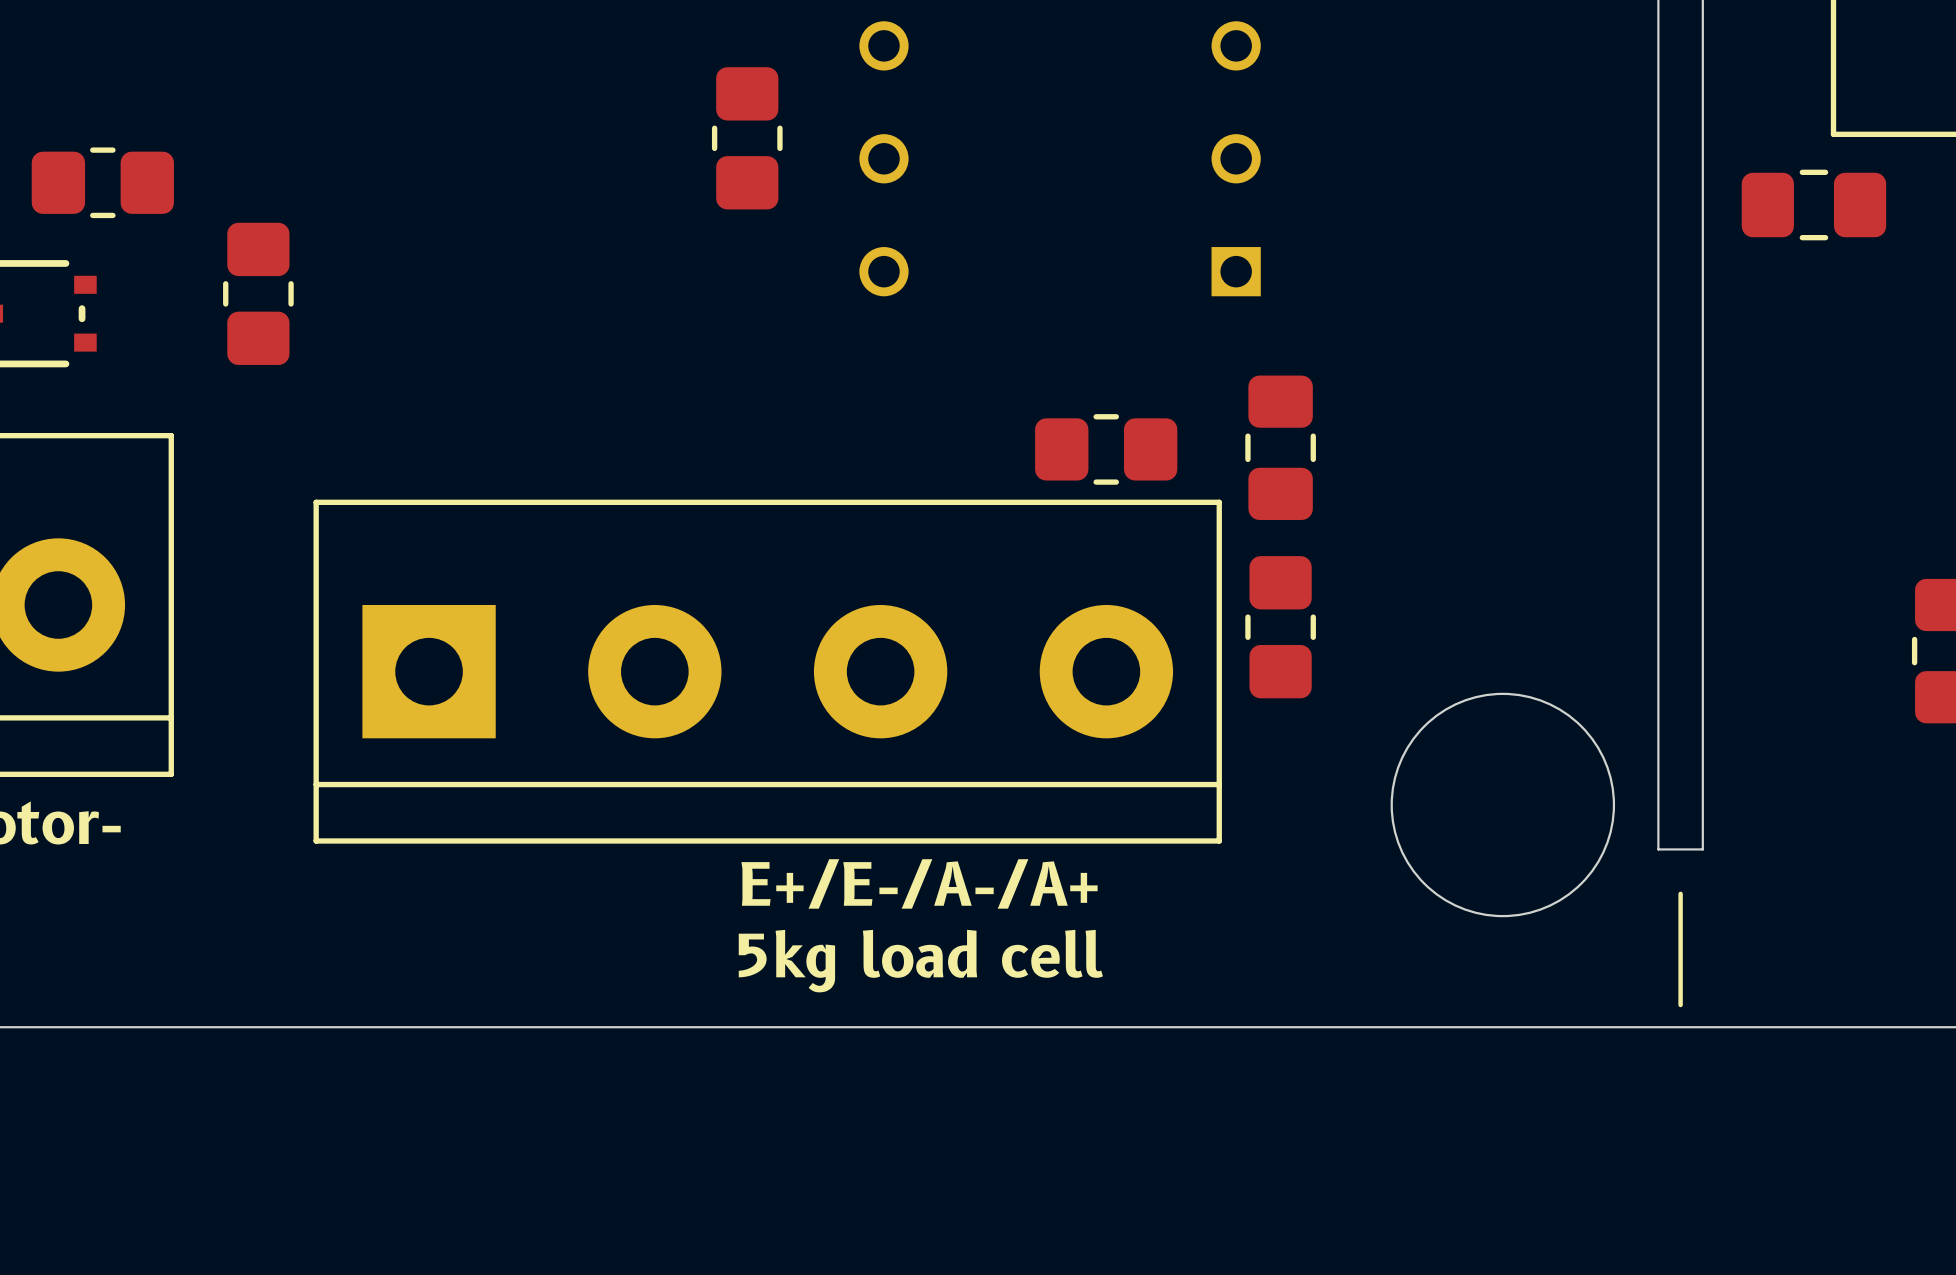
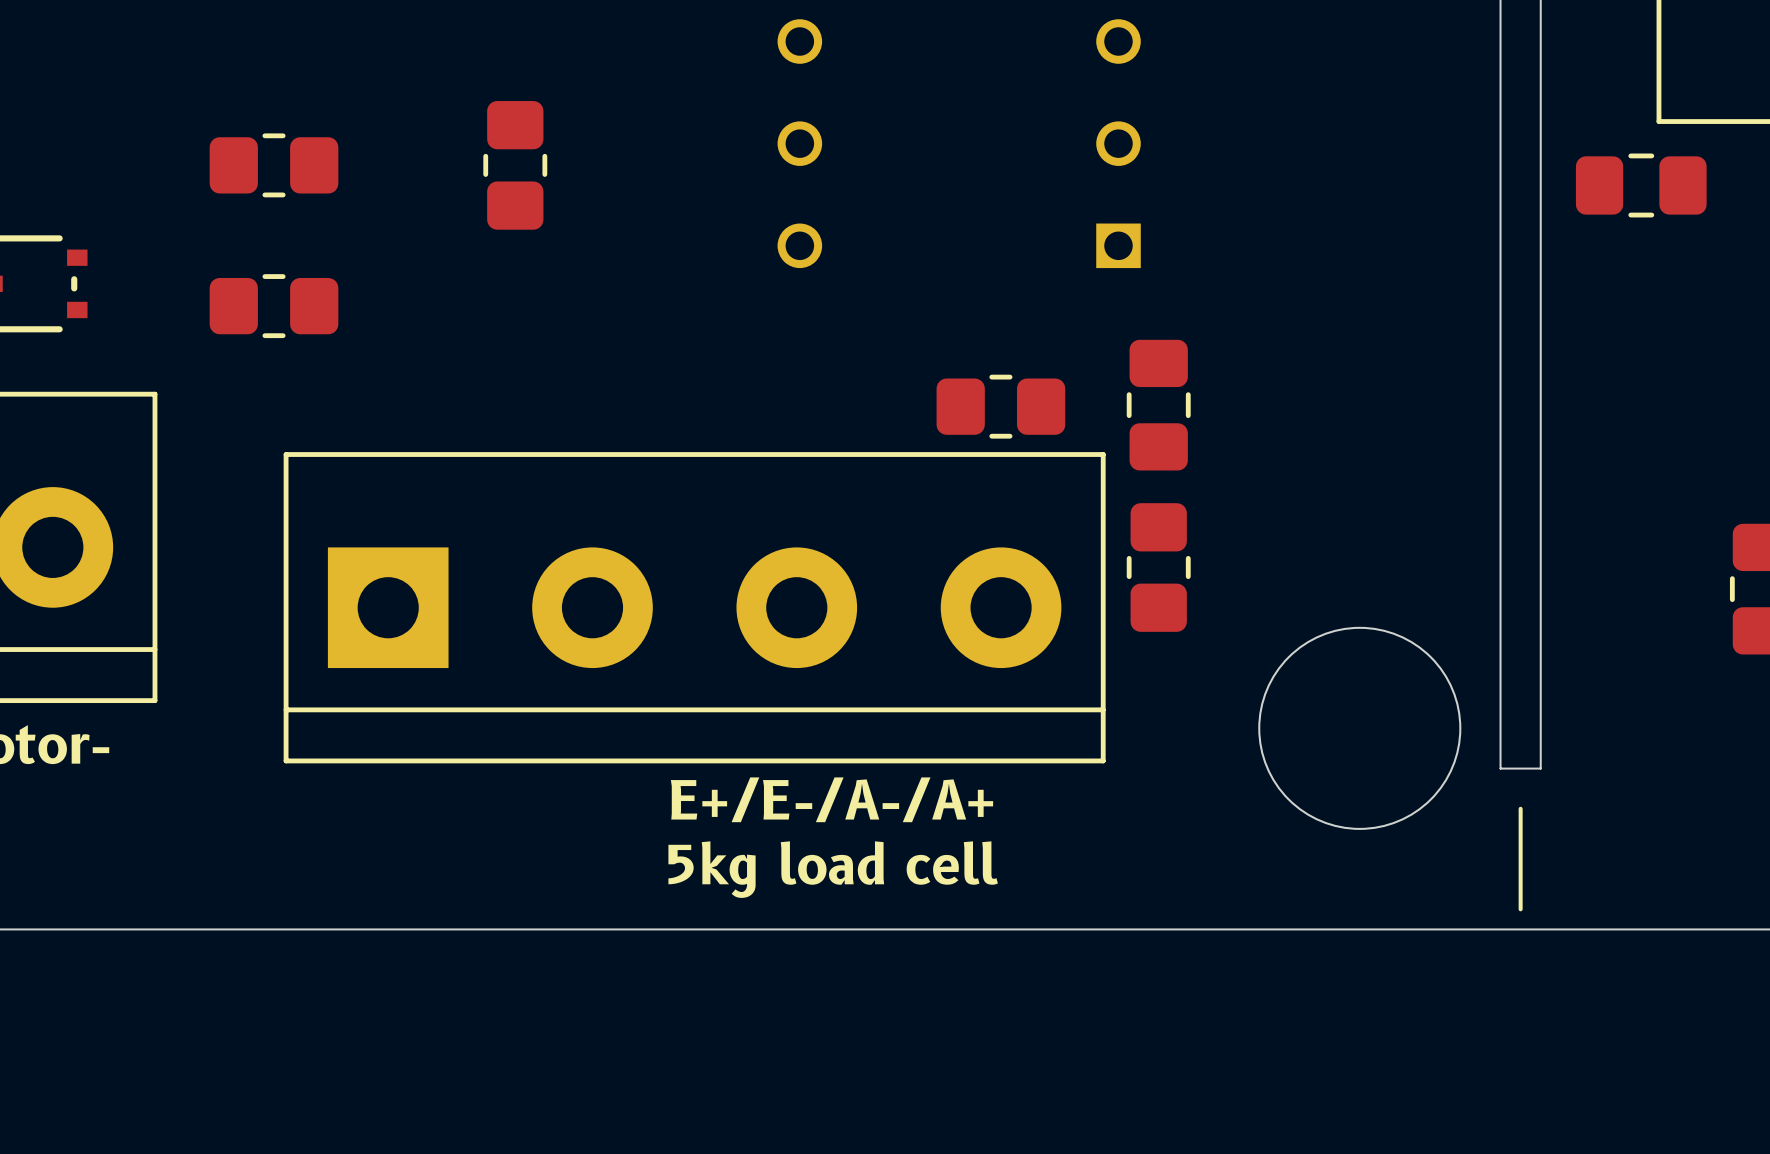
part: (747, 138) -> none
part: (102, 182) -> none
part: none -> (274, 165)
part: none -> (515, 165)
part: (258, 293) -> none
part: none -> (274, 306)

